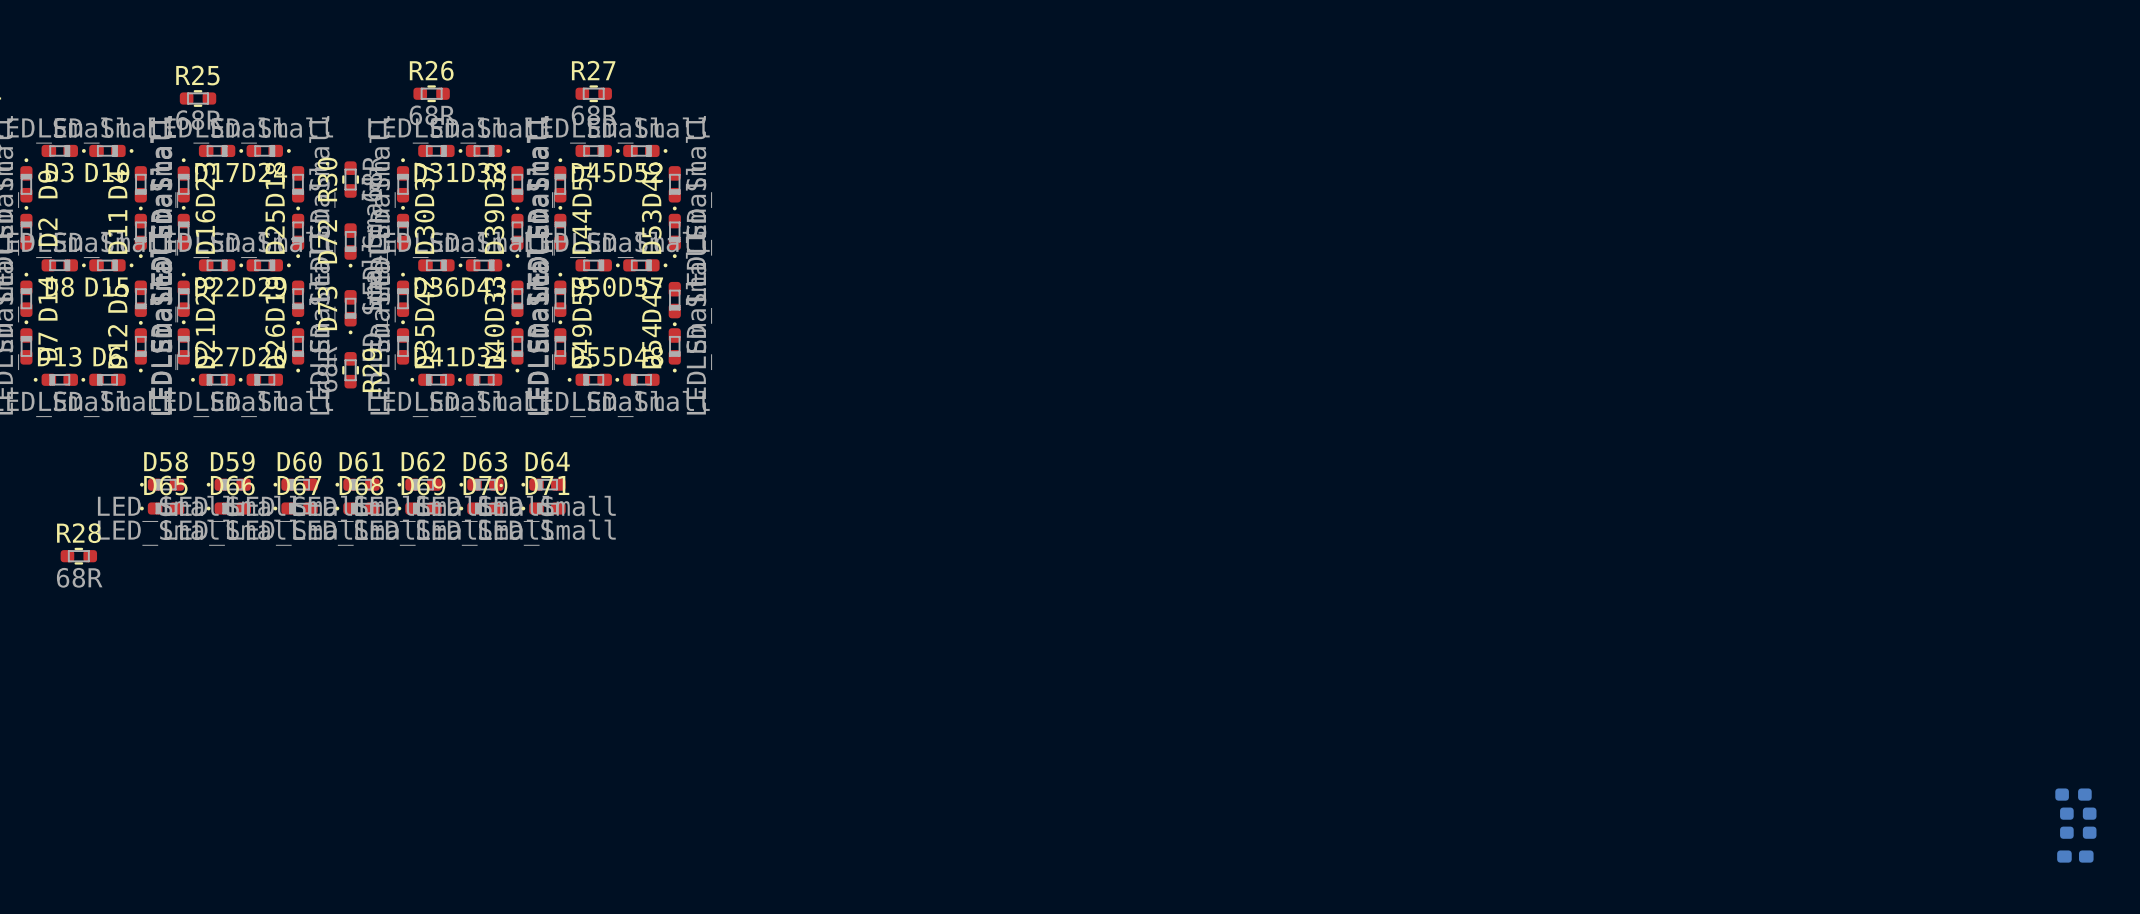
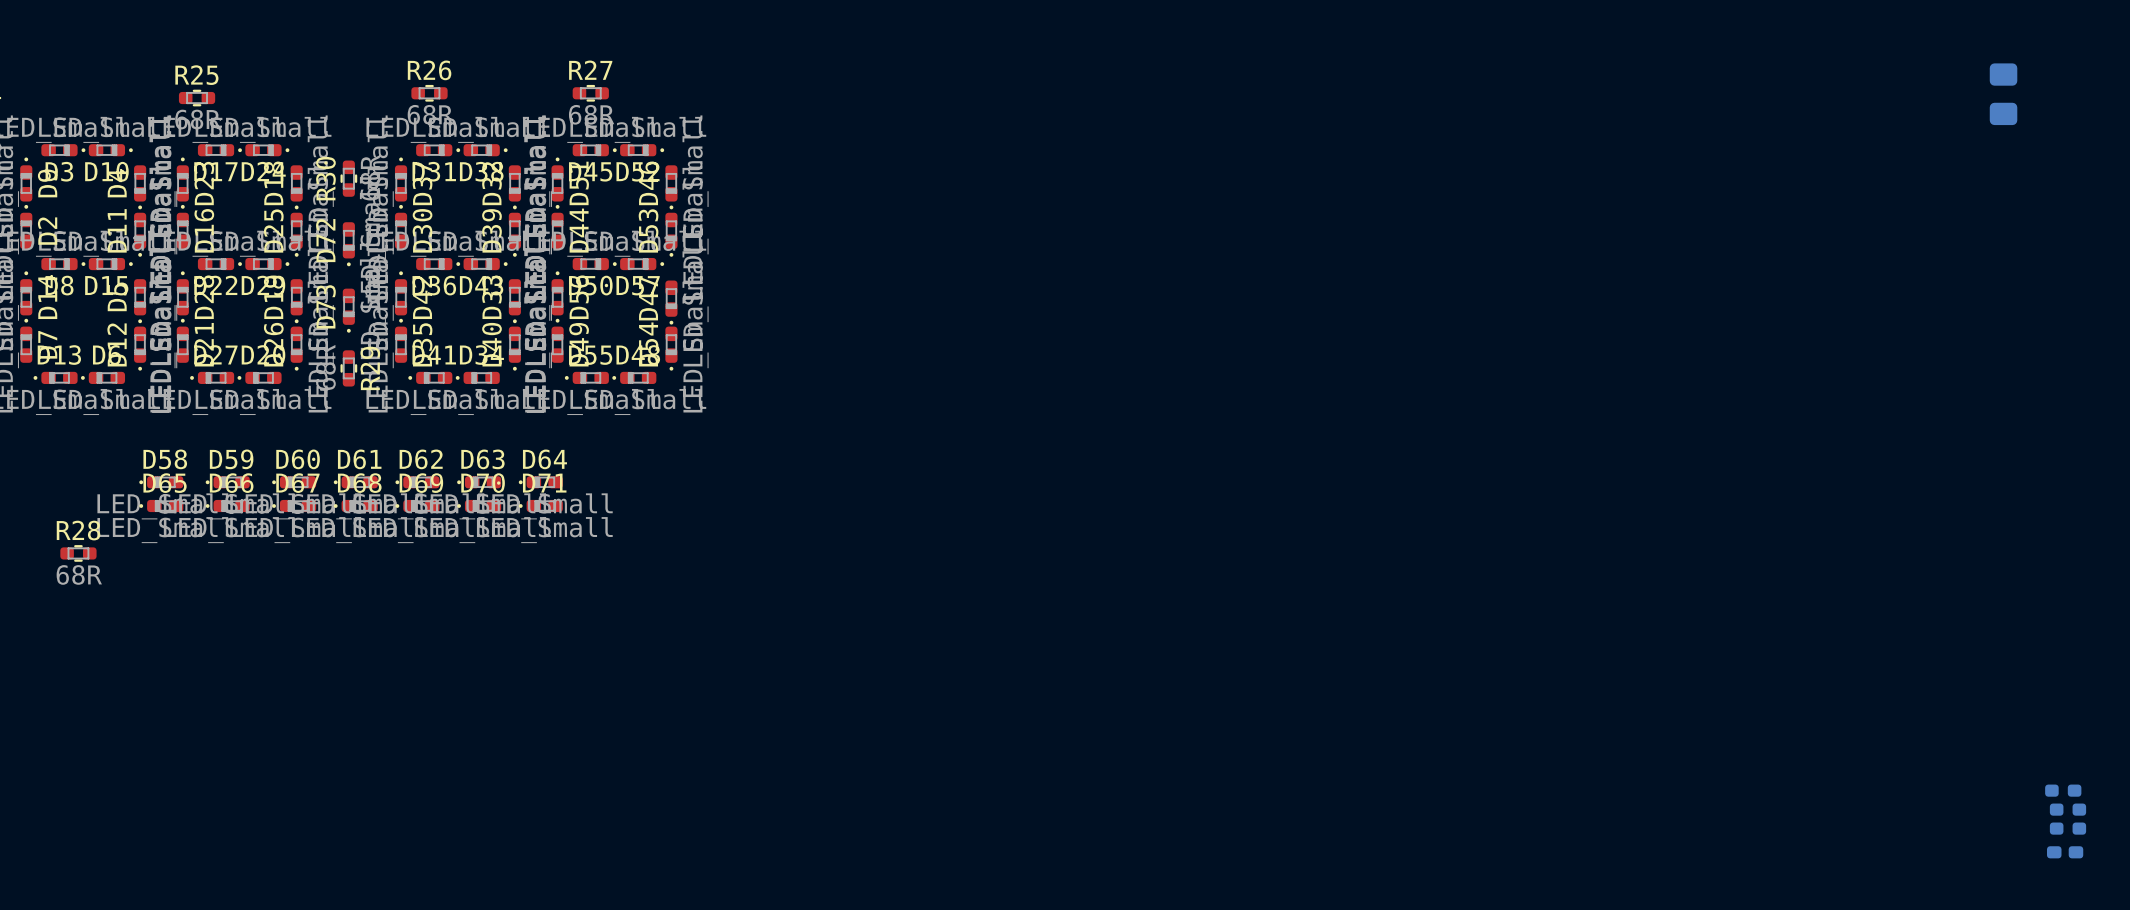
part: none -> (2003, 94)

